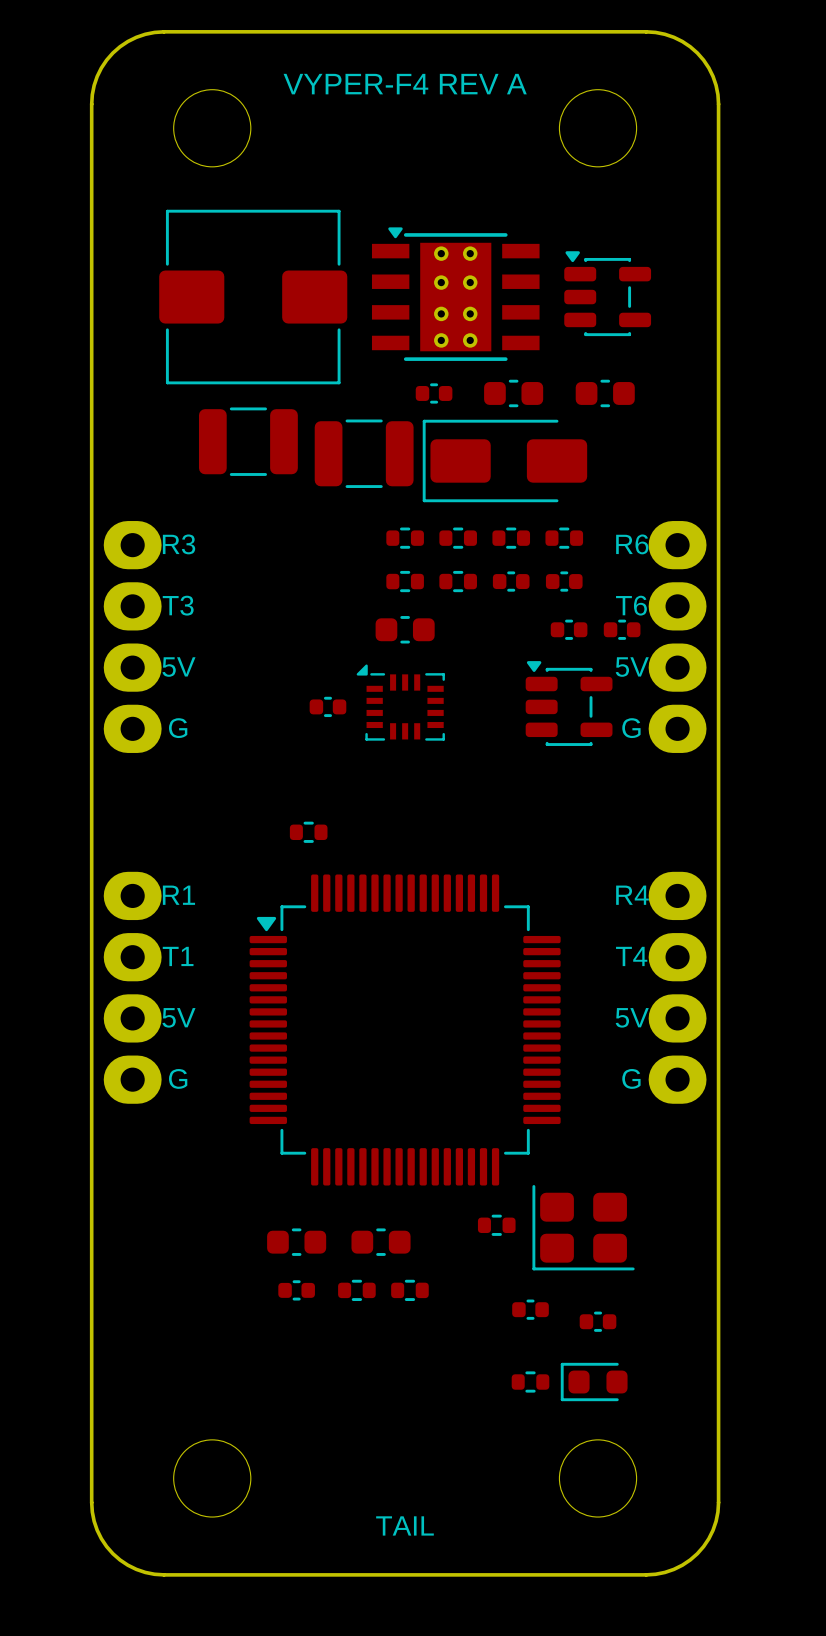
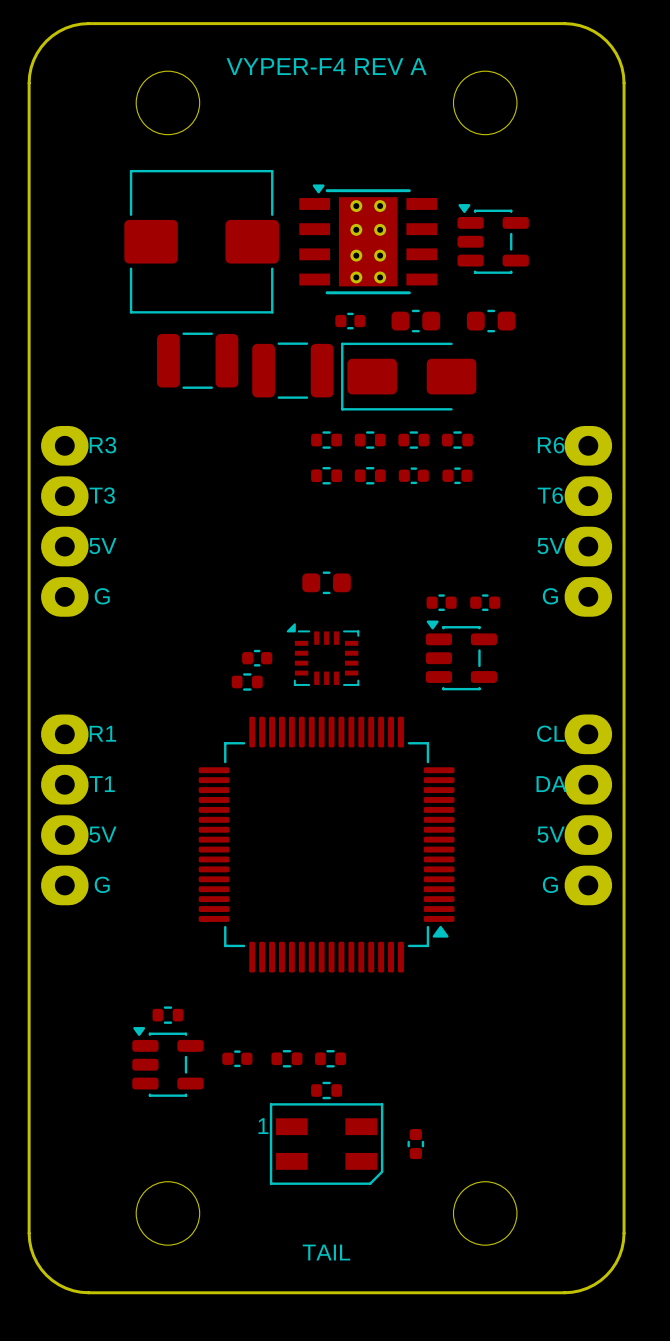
board edge: (164, 31) (136, 37) (112, 53) (97, 76) (91, 104) (91, 1502) (97, 1530) (112, 1553) (136, 1569) (164, 1574) -> (128, 23) (80, 24) (58, 31) (46, 41) (37, 53) (31, 67) (29, 83) (29, 1241) (37, 1263) (46, 1275) (58, 1284) (80, 1292) (128, 1292)
board edge: (646, 31) (673, 37) (697, 53) (713, 76) (718, 104) (718, 1502) (713, 1530) (697, 1553) (673, 1569) (646, 1574) -> (524, 23) (572, 24) (594, 31) (606, 41) (616, 53) (622, 67) (624, 83) (623, 1241) (619, 1256) (611, 1269) (594, 1284) (572, 1292) (524, 1292)
text position: R3 (179, 544) -> R3 (102, 445)
text position: R6 (632, 544) -> R6 (551, 445)
text position: T3 (178, 605) -> T3 (102, 495)
text position: T6 (631, 605) -> T6 (550, 495)
part: (405, 629) -> none
part: (569, 629) -> none
part: (622, 629) -> none
part position: (132, 636) -> (64, 521)
part position: (677, 636) -> (588, 521)
part footprint: [356, 664, 445, 741] -> [302, 571, 351, 595]
text position: 5V (178, 667) -> 5V (102, 546)
text position: 5V (632, 667) -> 5V (551, 546)
part position: (569, 703) -> (461, 655)
part position: (327, 706) -> (257, 658)
text position: G (178, 728) -> G (102, 596)
text position: G (631, 728) -> G (550, 596)
part: none -> (441, 602)
part: none -> (485, 602)
part: none -> (323, 654)
text position: R1 (178, 895) -> R1 (102, 733)
text: R4 (632, 895) -> none
text: none -> CL (550, 733)
text position: T1 (178, 956) -> T1 (102, 784)
text: T4 (631, 956) -> none
text: none -> DA (551, 784)
part position: (132, 987) -> (64, 809)
part position: (677, 987) -> (588, 809)
text position: 5V (178, 1017) -> 5V (102, 834)
text position: 5V (632, 1017) -> 5V (551, 834)
part rotation: 0° (405, 1029) -> 180° (326, 844)
text position: G (178, 1078) -> G (102, 884)
text position: G (631, 1078) -> G (550, 884)
part position: (496, 1225) -> (326, 1090)
part: (583, 1227) -> none
part: none -> (167, 1015)
part: (296, 1242) -> none
part: (381, 1242) -> none
part: none -> (167, 1061)
part: (530, 1309) -> none
part: (598, 1321) -> none
part footprint: [511, 1371, 550, 1393] -> [407, 1128, 425, 1160]
part: (594, 1382) -> none
part: none -> (326, 1144)

